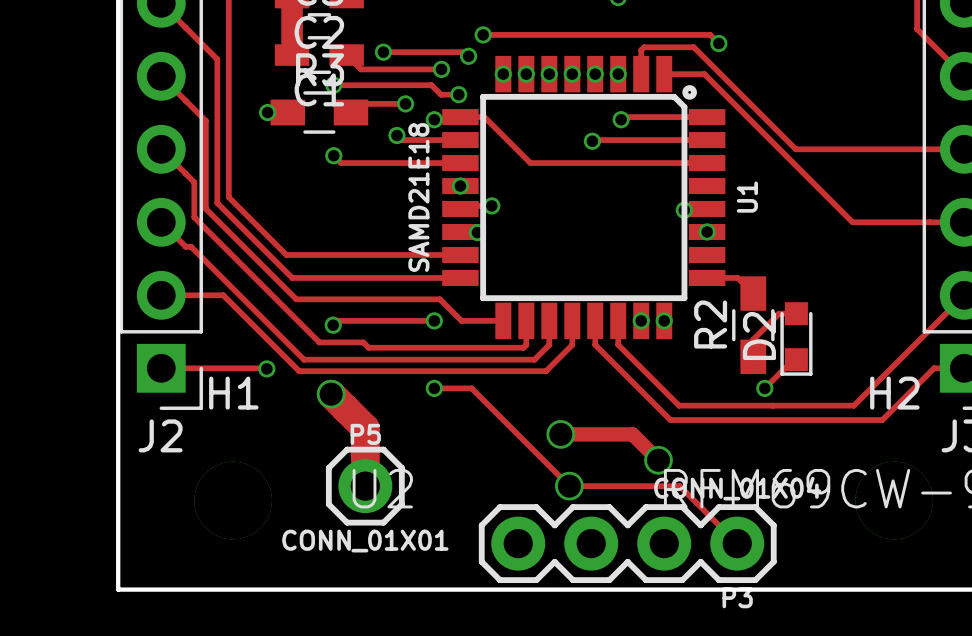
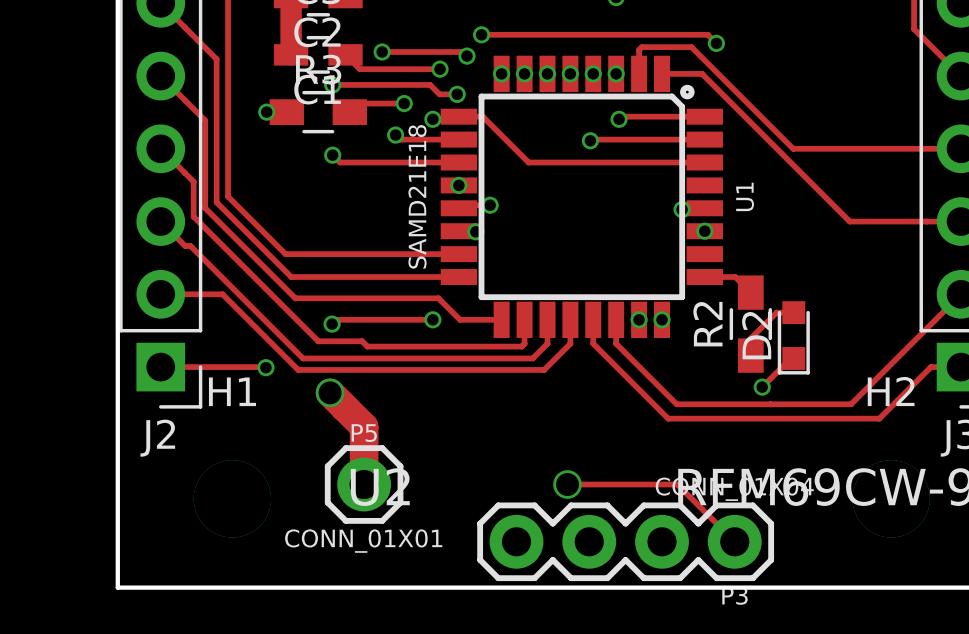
track: (434, 388) (471, 388) (569, 486) -> none
via: (434, 388) -> none
track: (560, 434) (632, 434) (658, 460) -> none
via: (560, 434) -> none
via: (658, 460) -> none

